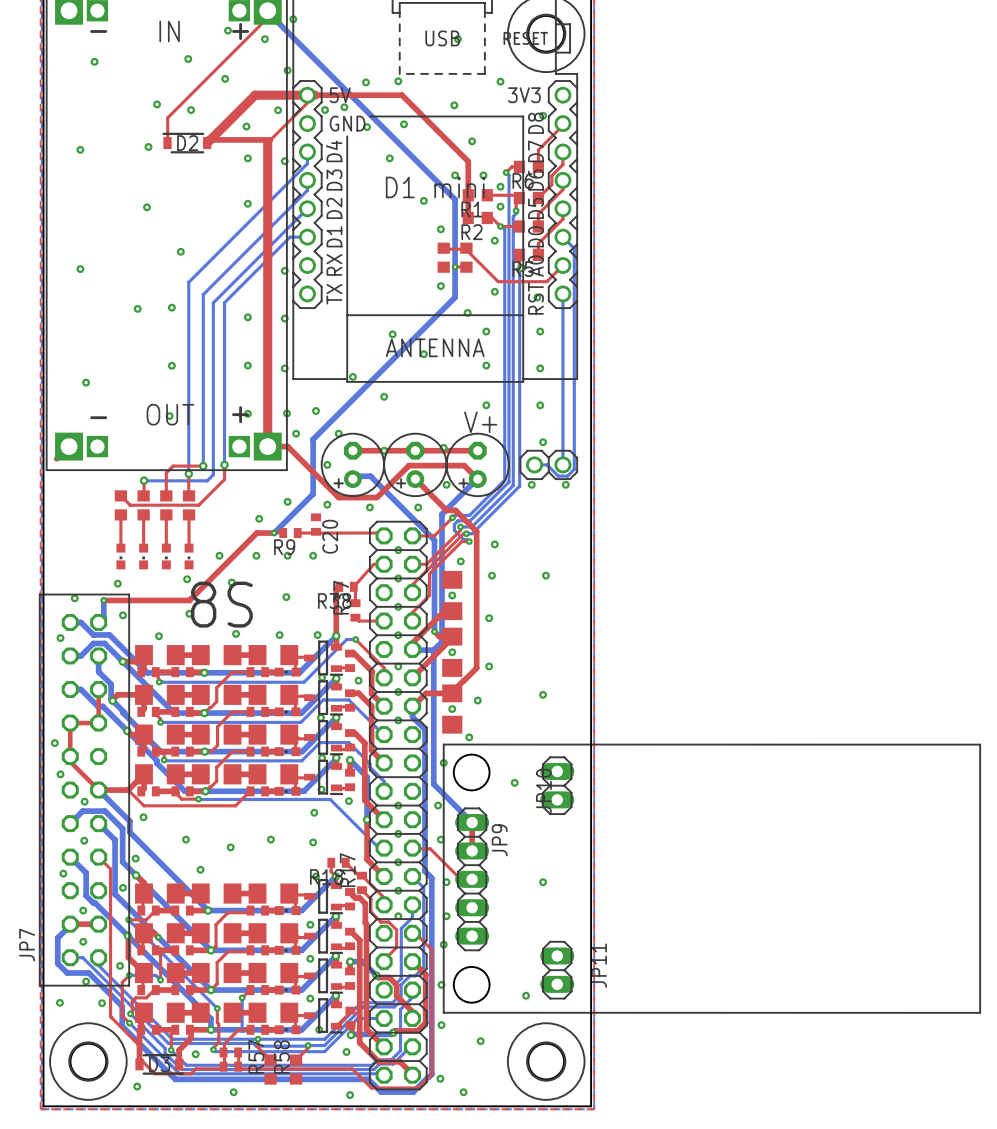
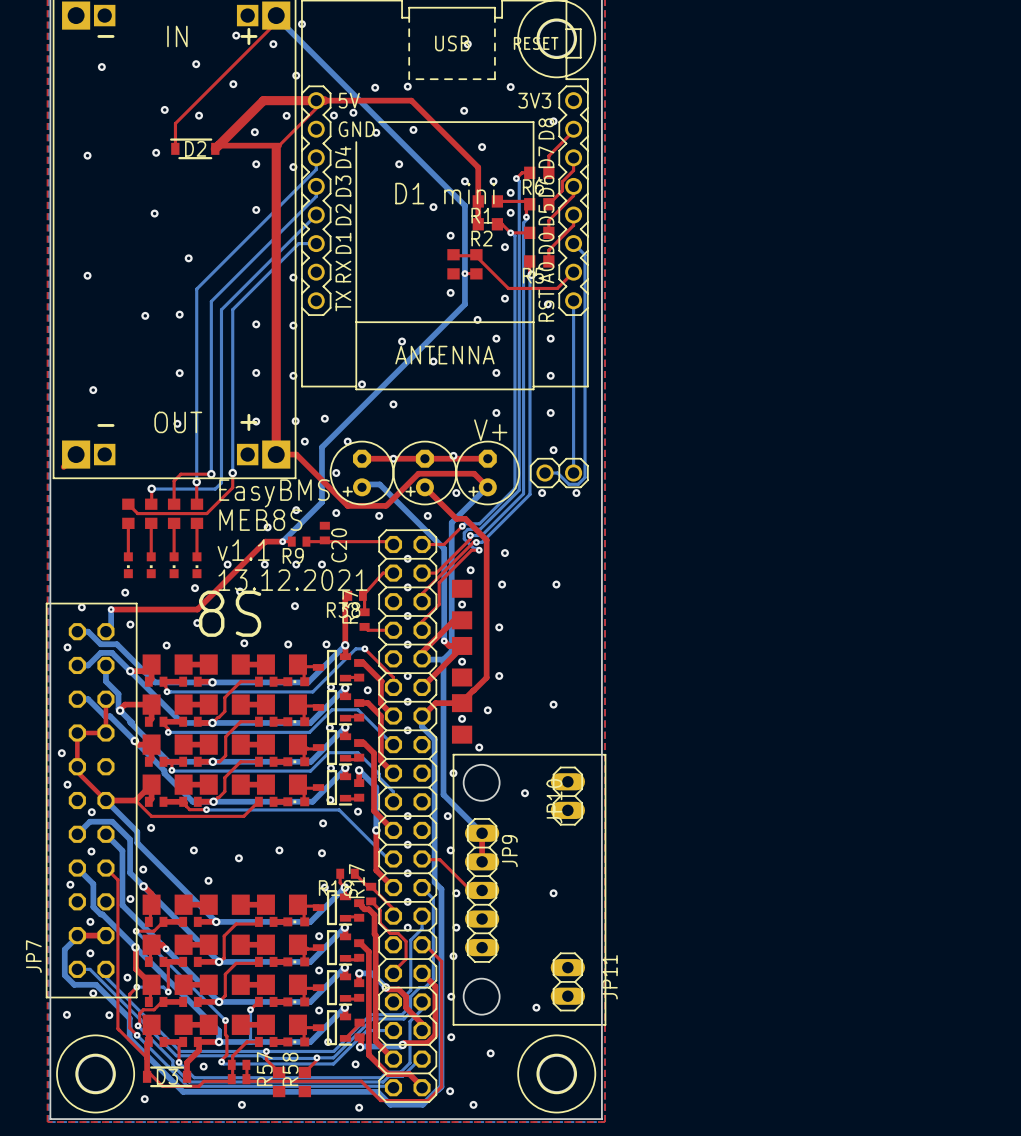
text: none -> EasyBMS (274, 493)
text: none -> MEB8S (260, 520)
text: none -> v1.1 (243, 550)
text: none -> 13.12.2021 (292, 580)
line: (443, 744) (980, 744) (980, 1012) (443, 1012) -> (453, 754) (605, 754) (605, 1024) (453, 1024)

